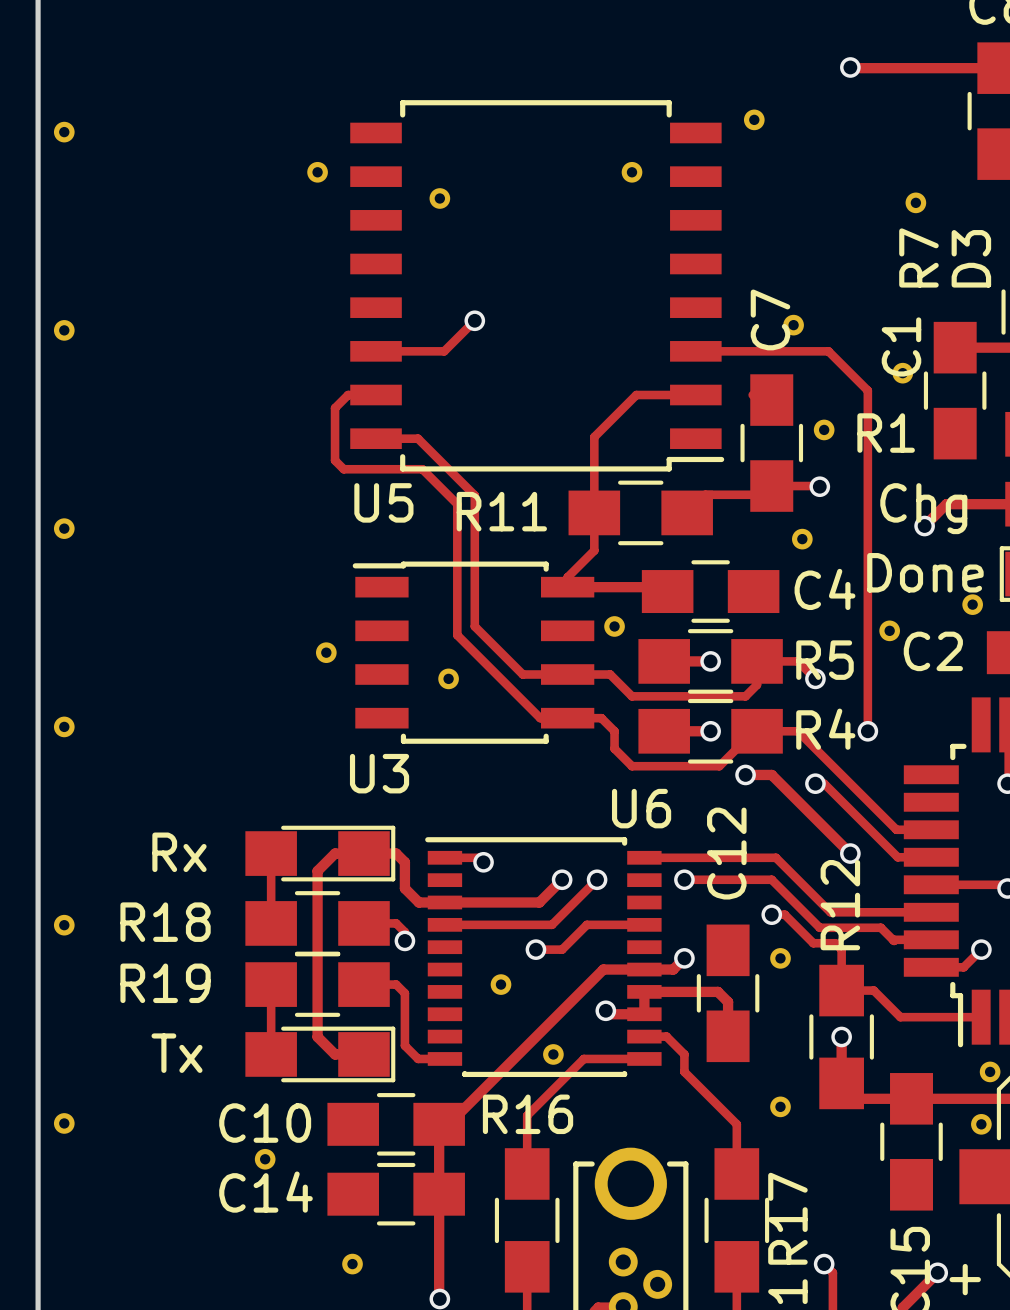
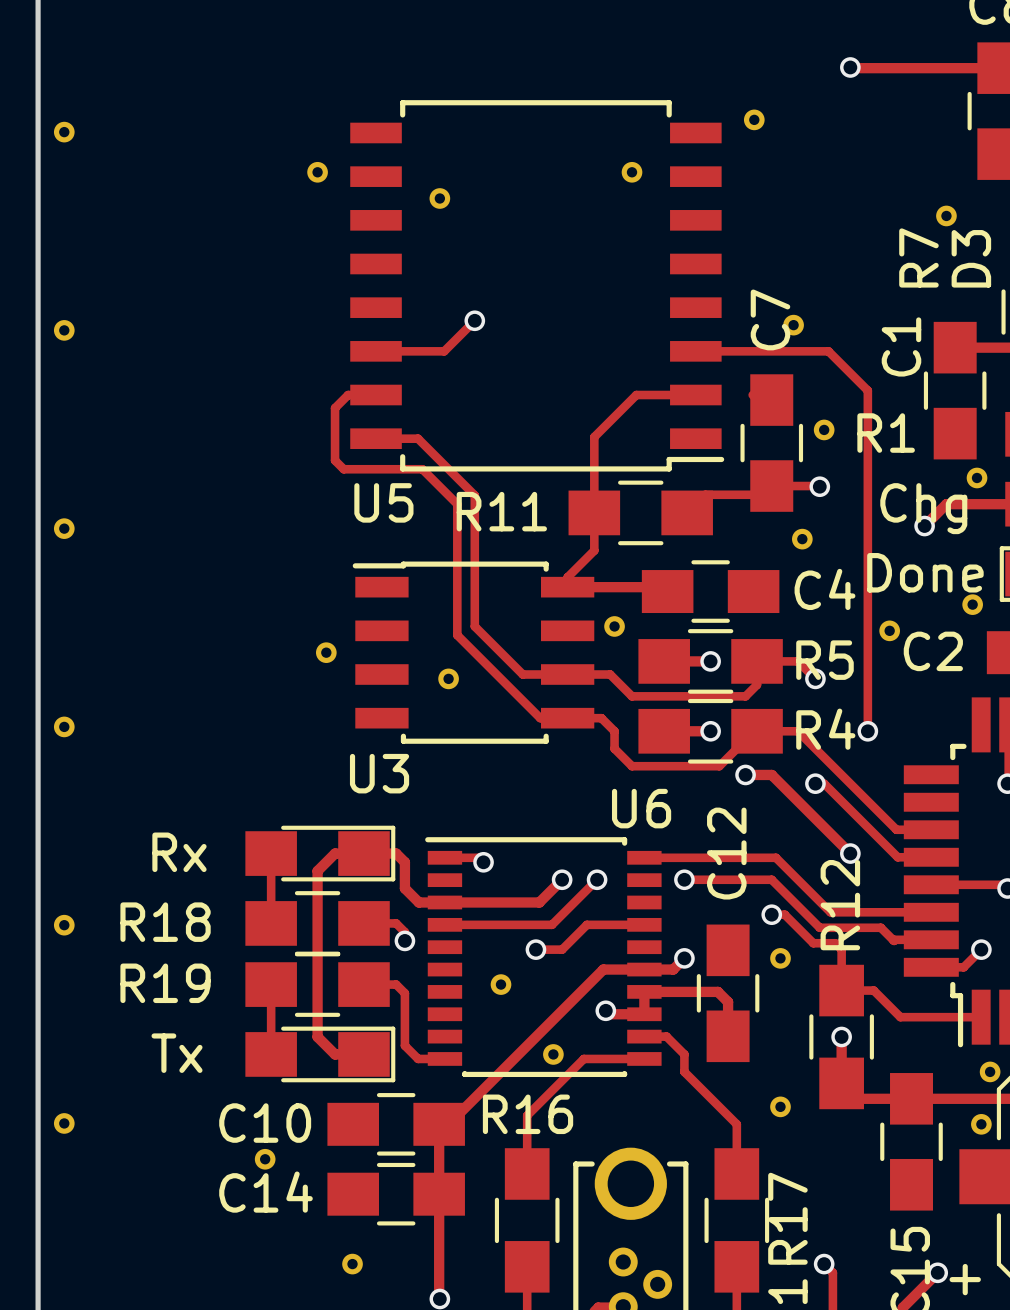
part position: (915, 202) -> (946, 215)
part position: (902, 373) -> (977, 477)

